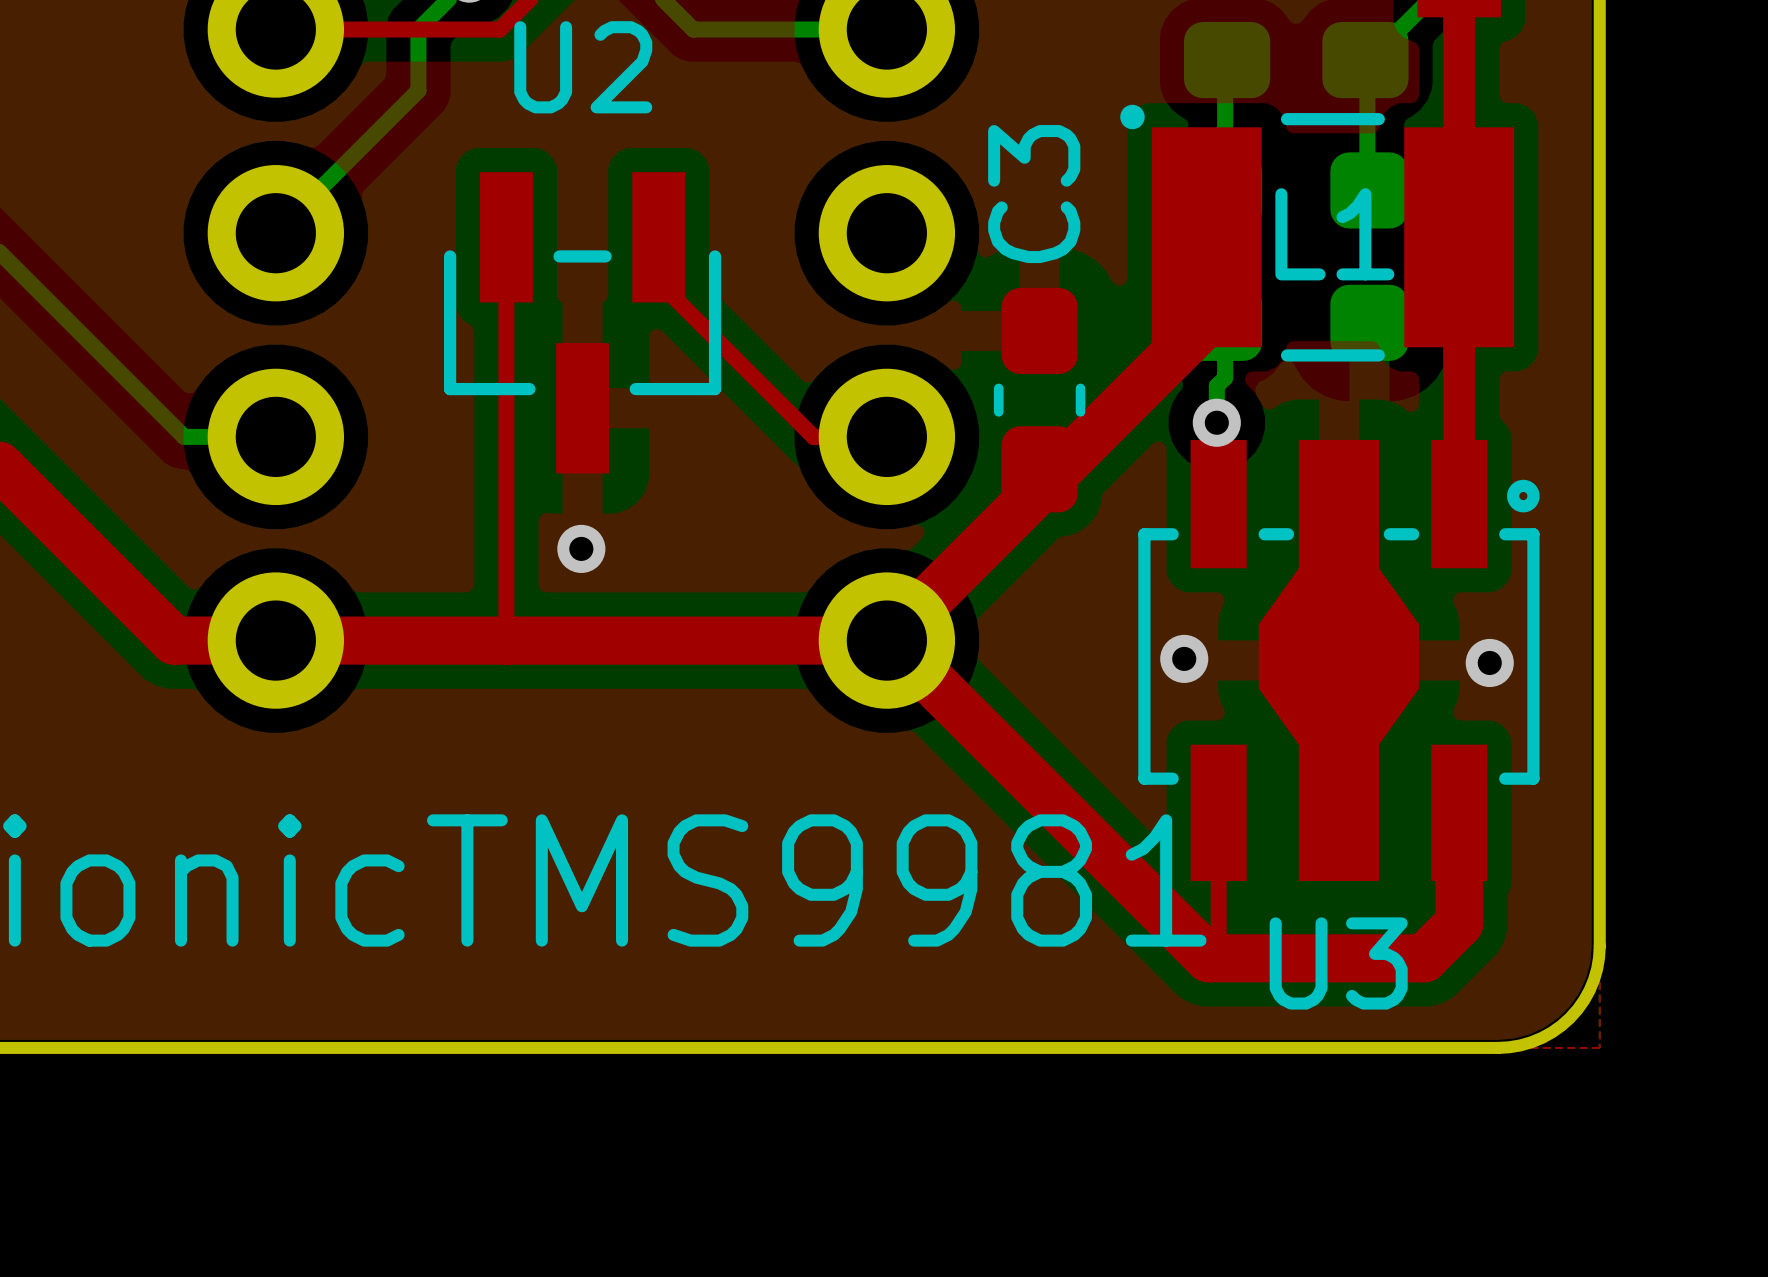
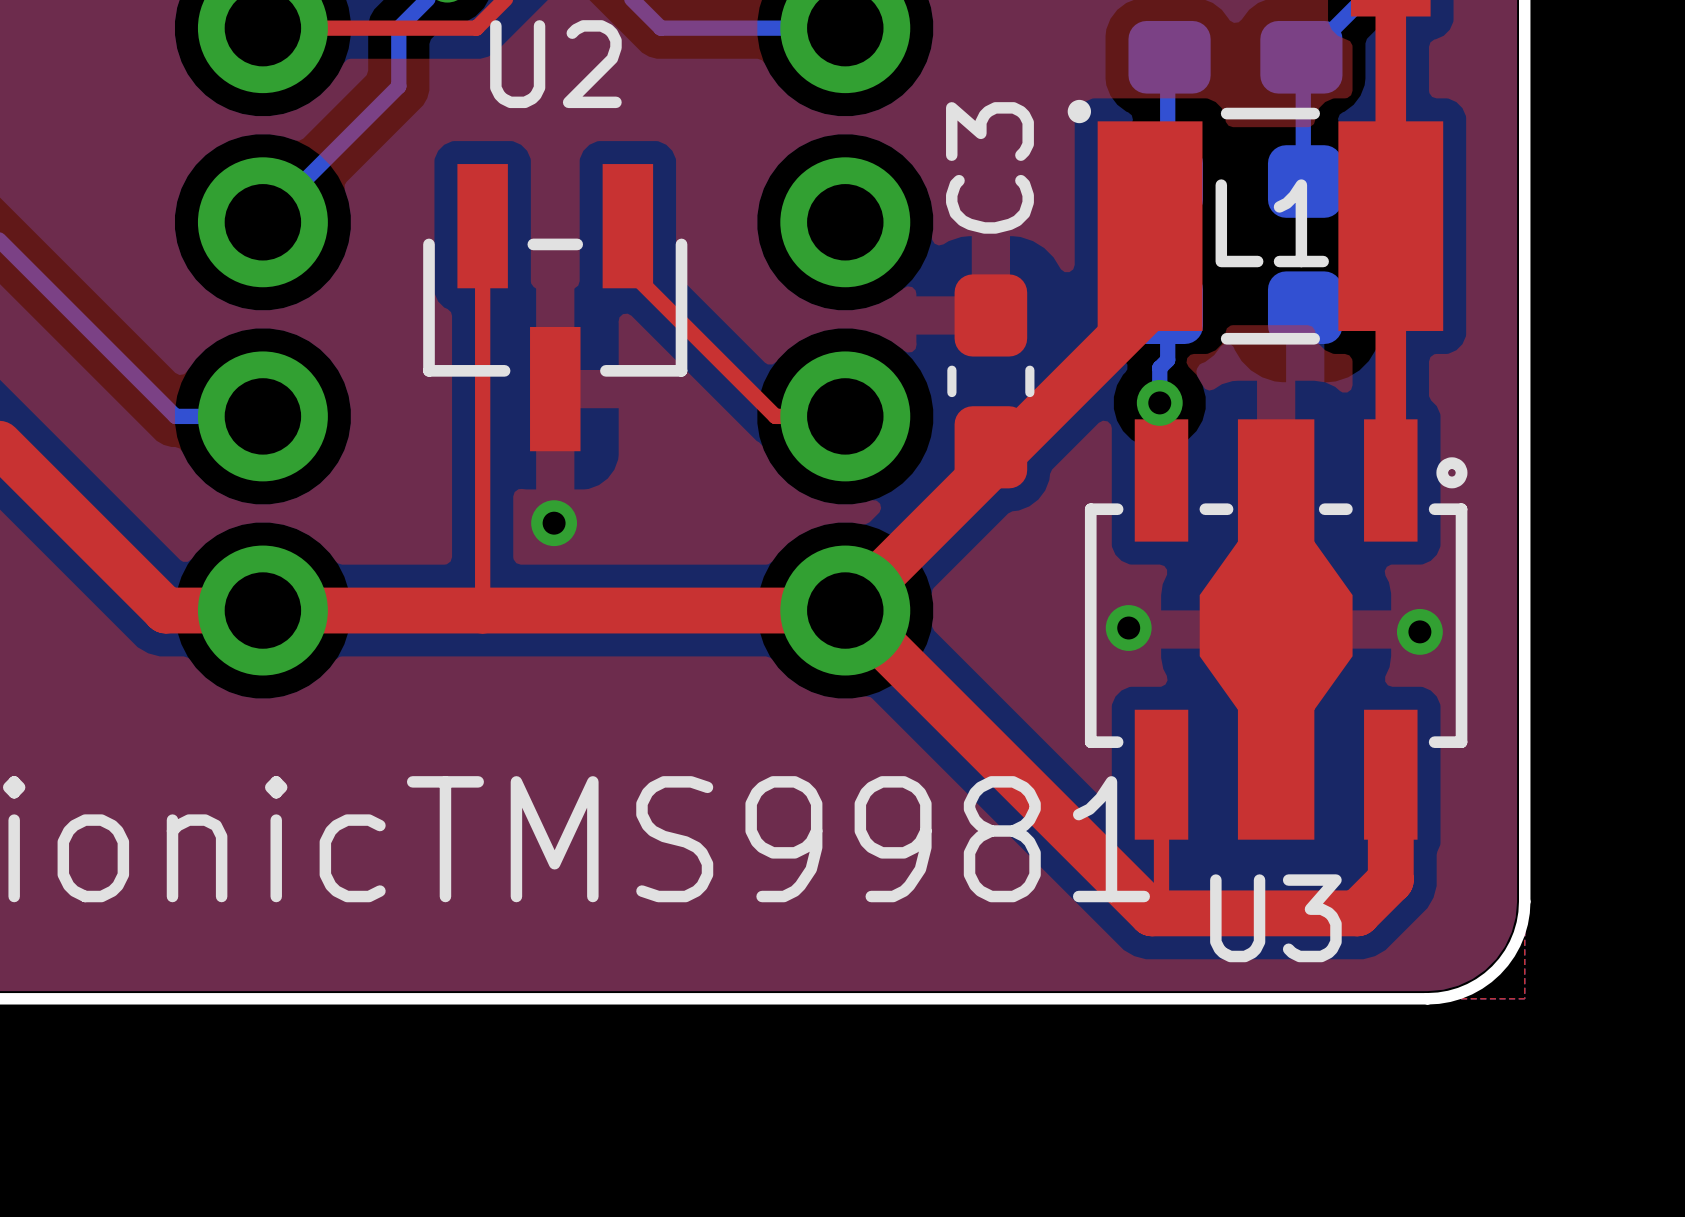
C3 name position: C3 (1034, 194) -> C3 (989, 167)

